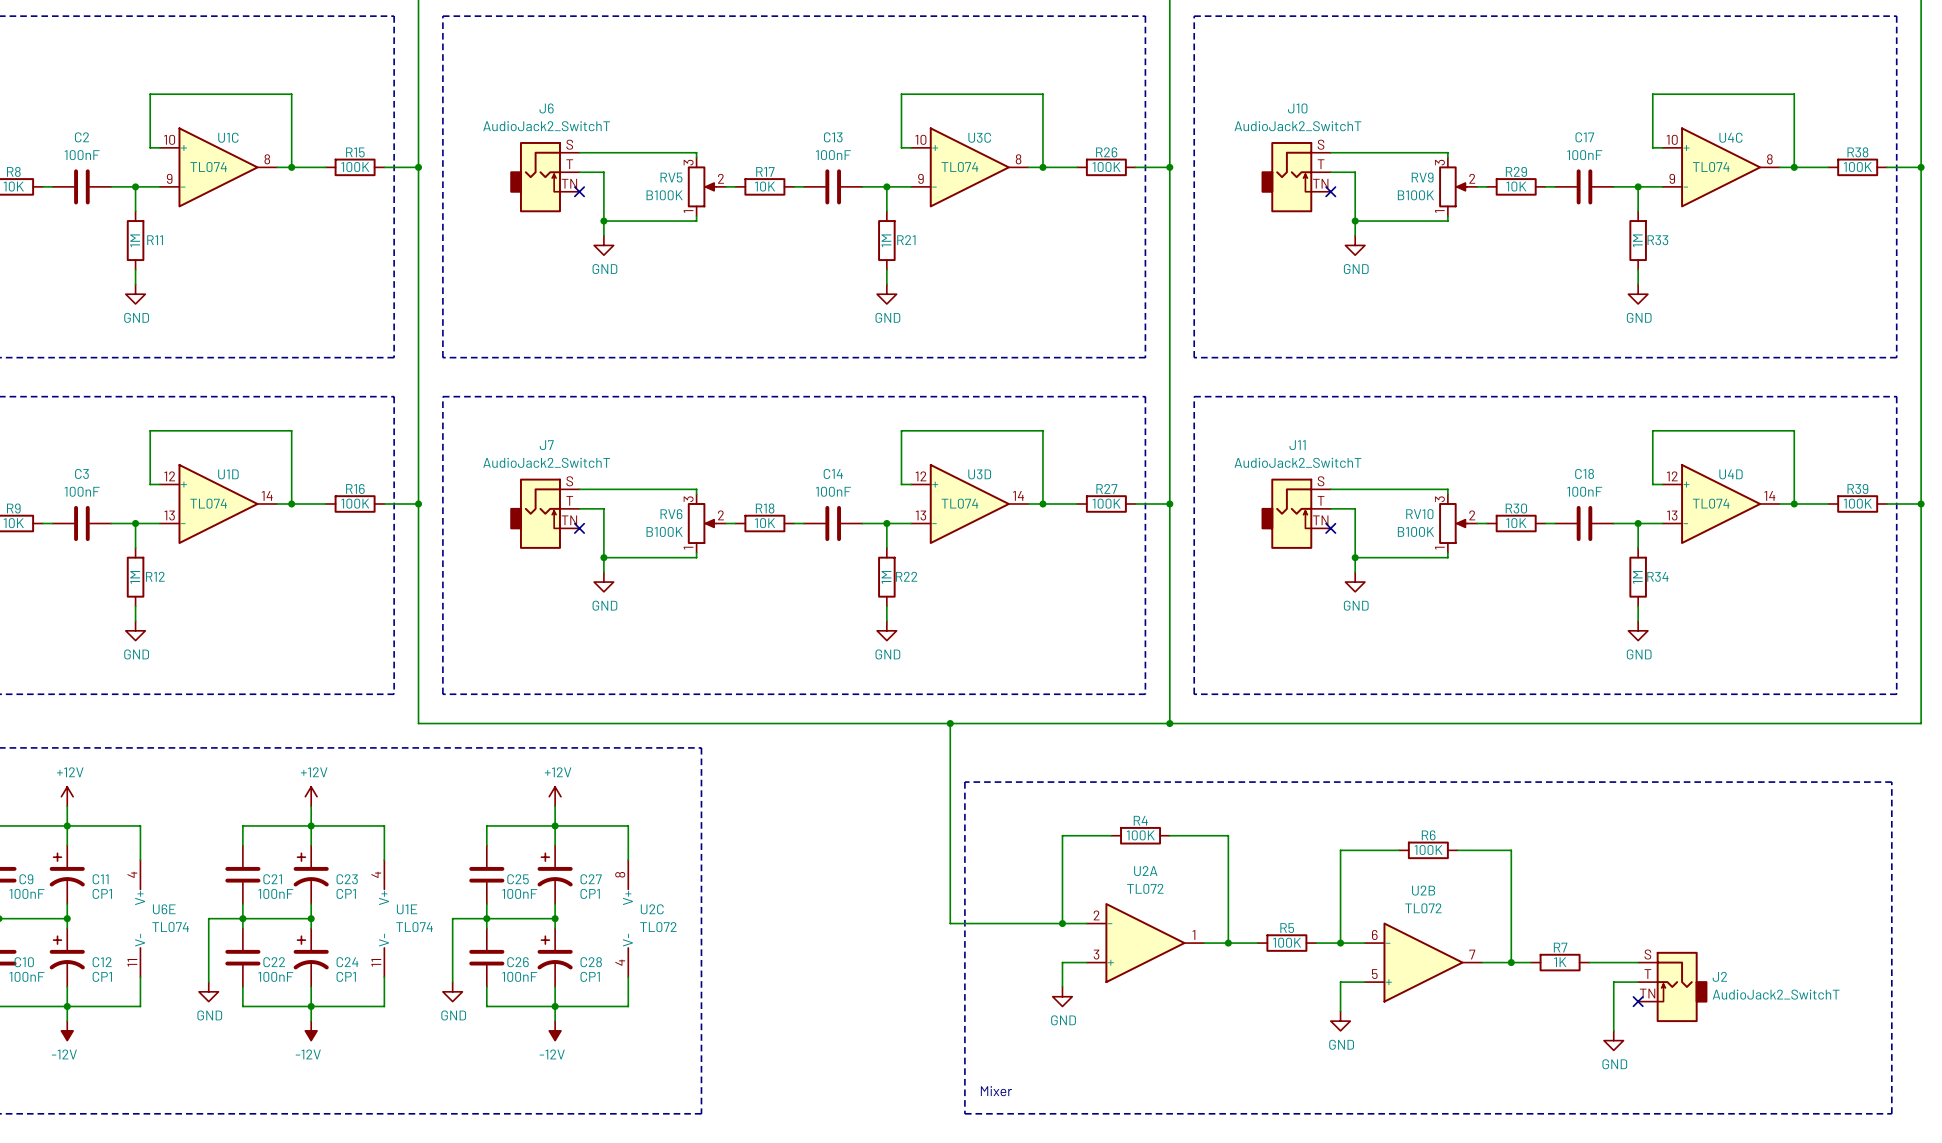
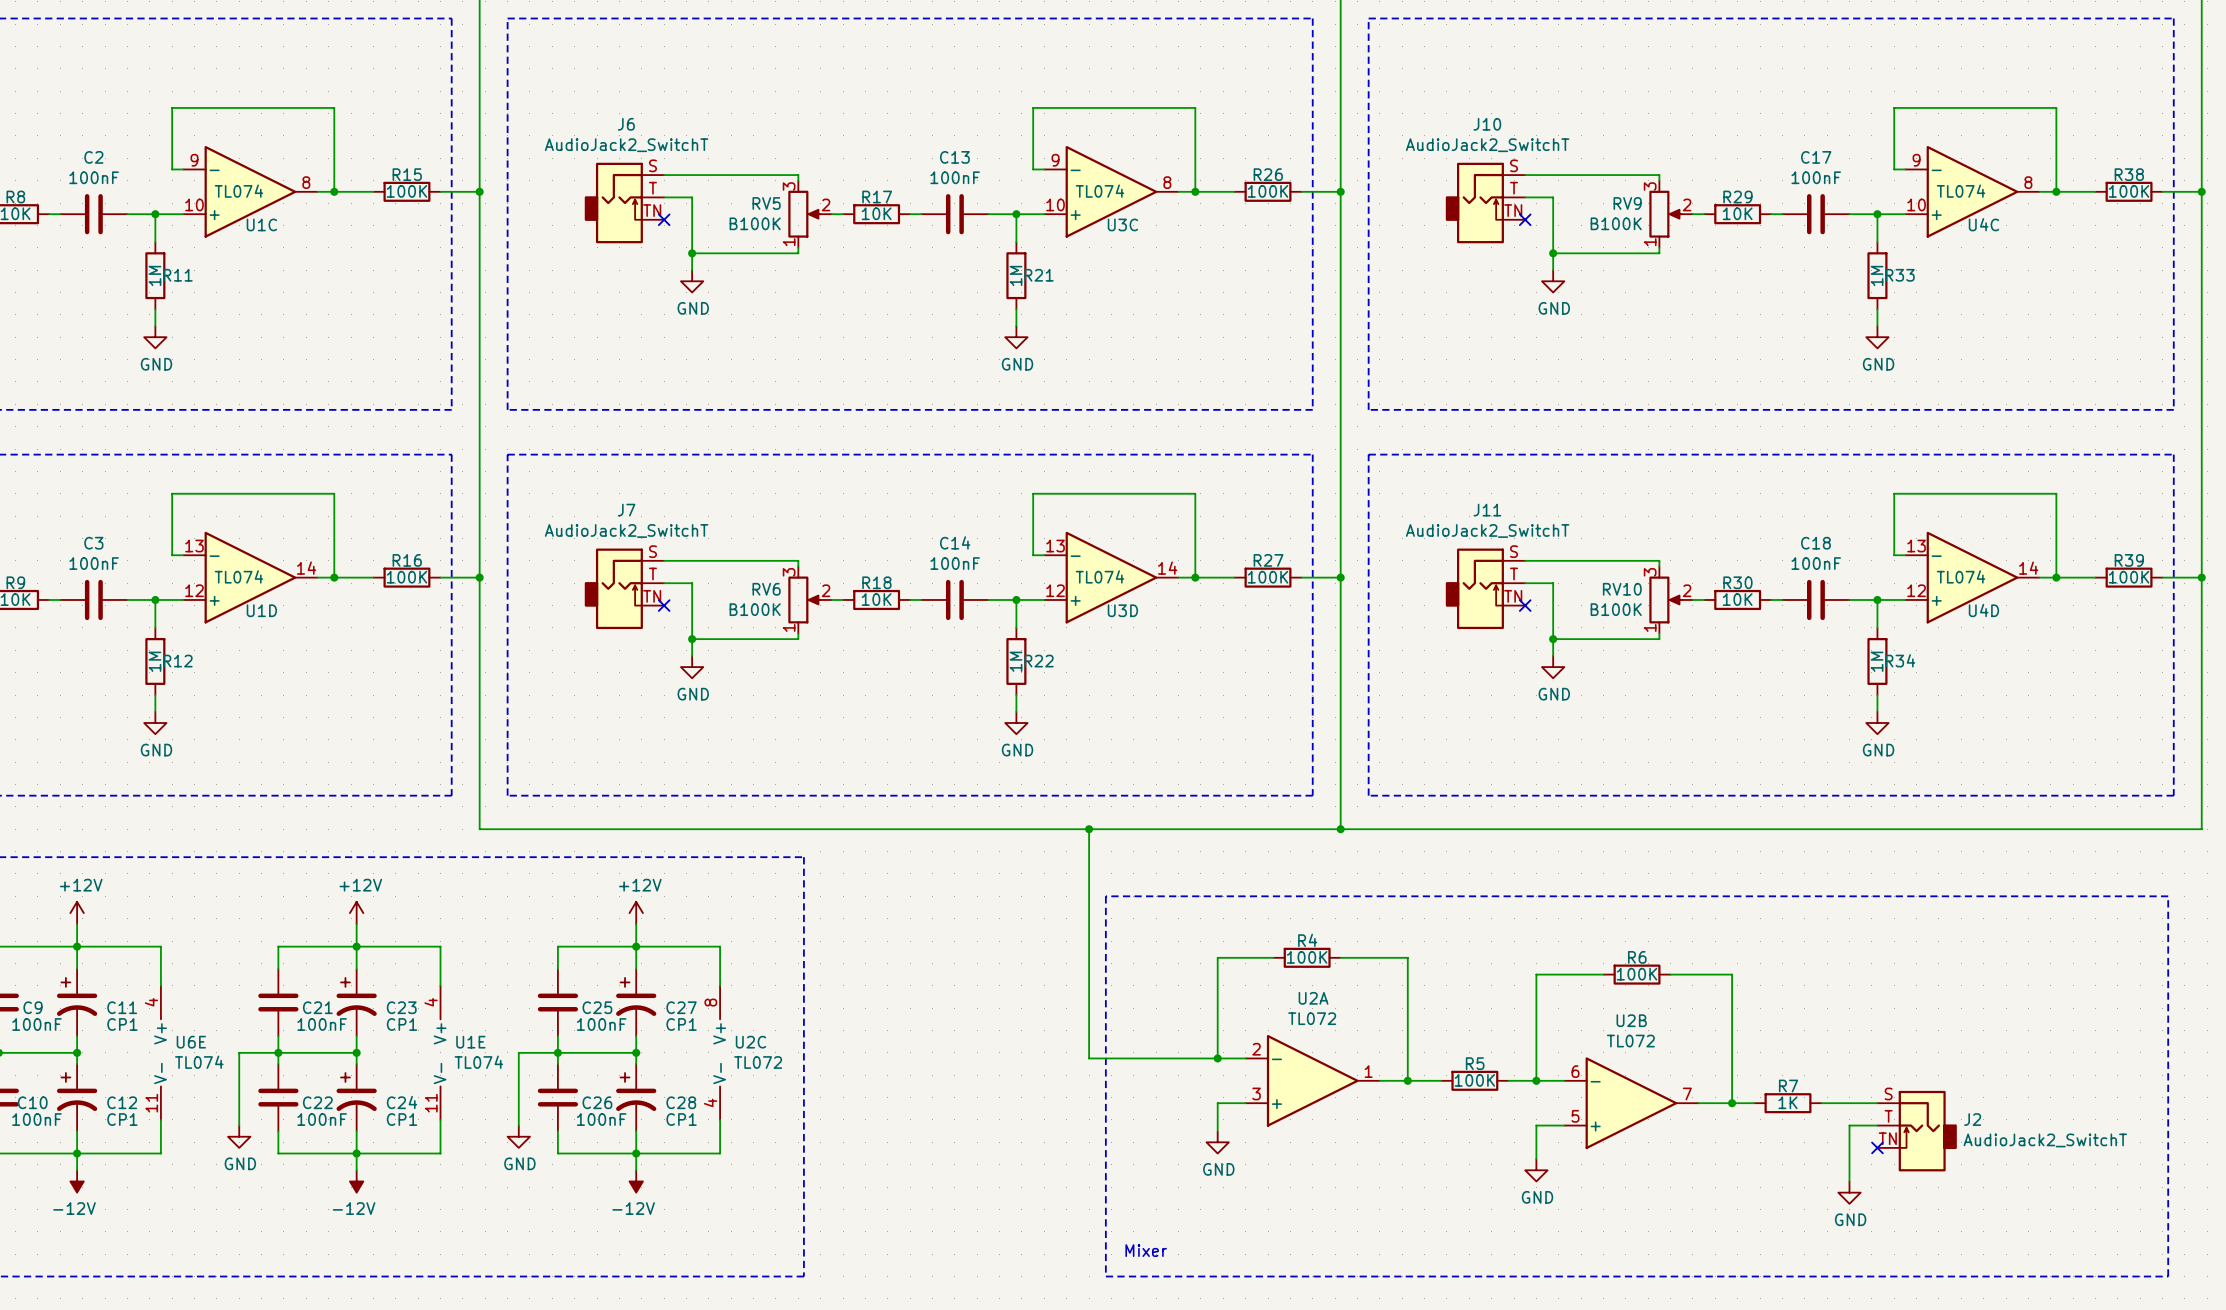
U1C flip: as is (218, 167) -> up-down (250, 191)
U3C flip: as is (969, 167) -> up-down (1111, 191)
U4C flip: as is (1721, 167) -> up-down (1972, 191)
U1D flip: as is (218, 503) -> up-down (250, 577)
U3D flip: as is (969, 503) -> up-down (1111, 577)
U4D flip: as is (1721, 503) -> up-down (1972, 577)

